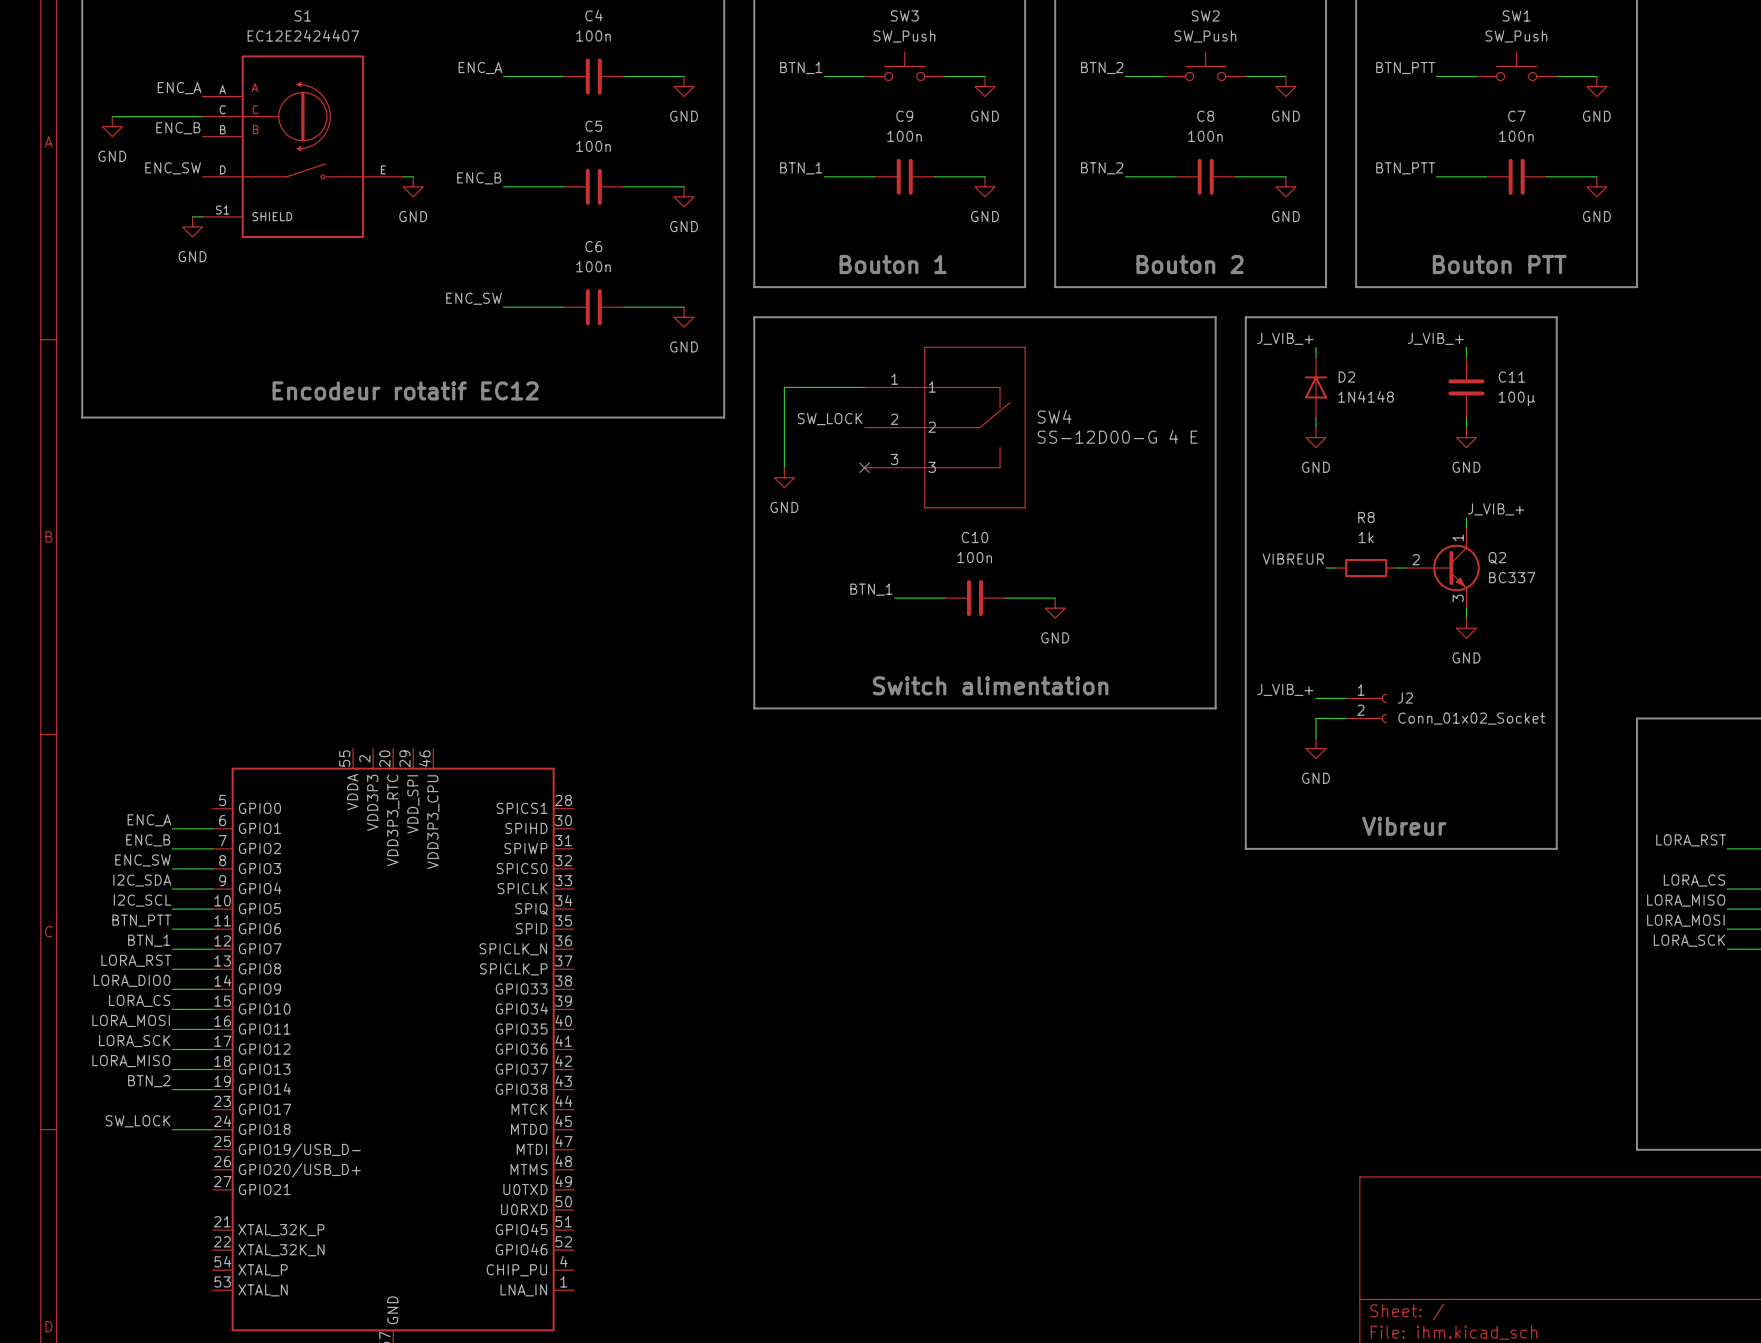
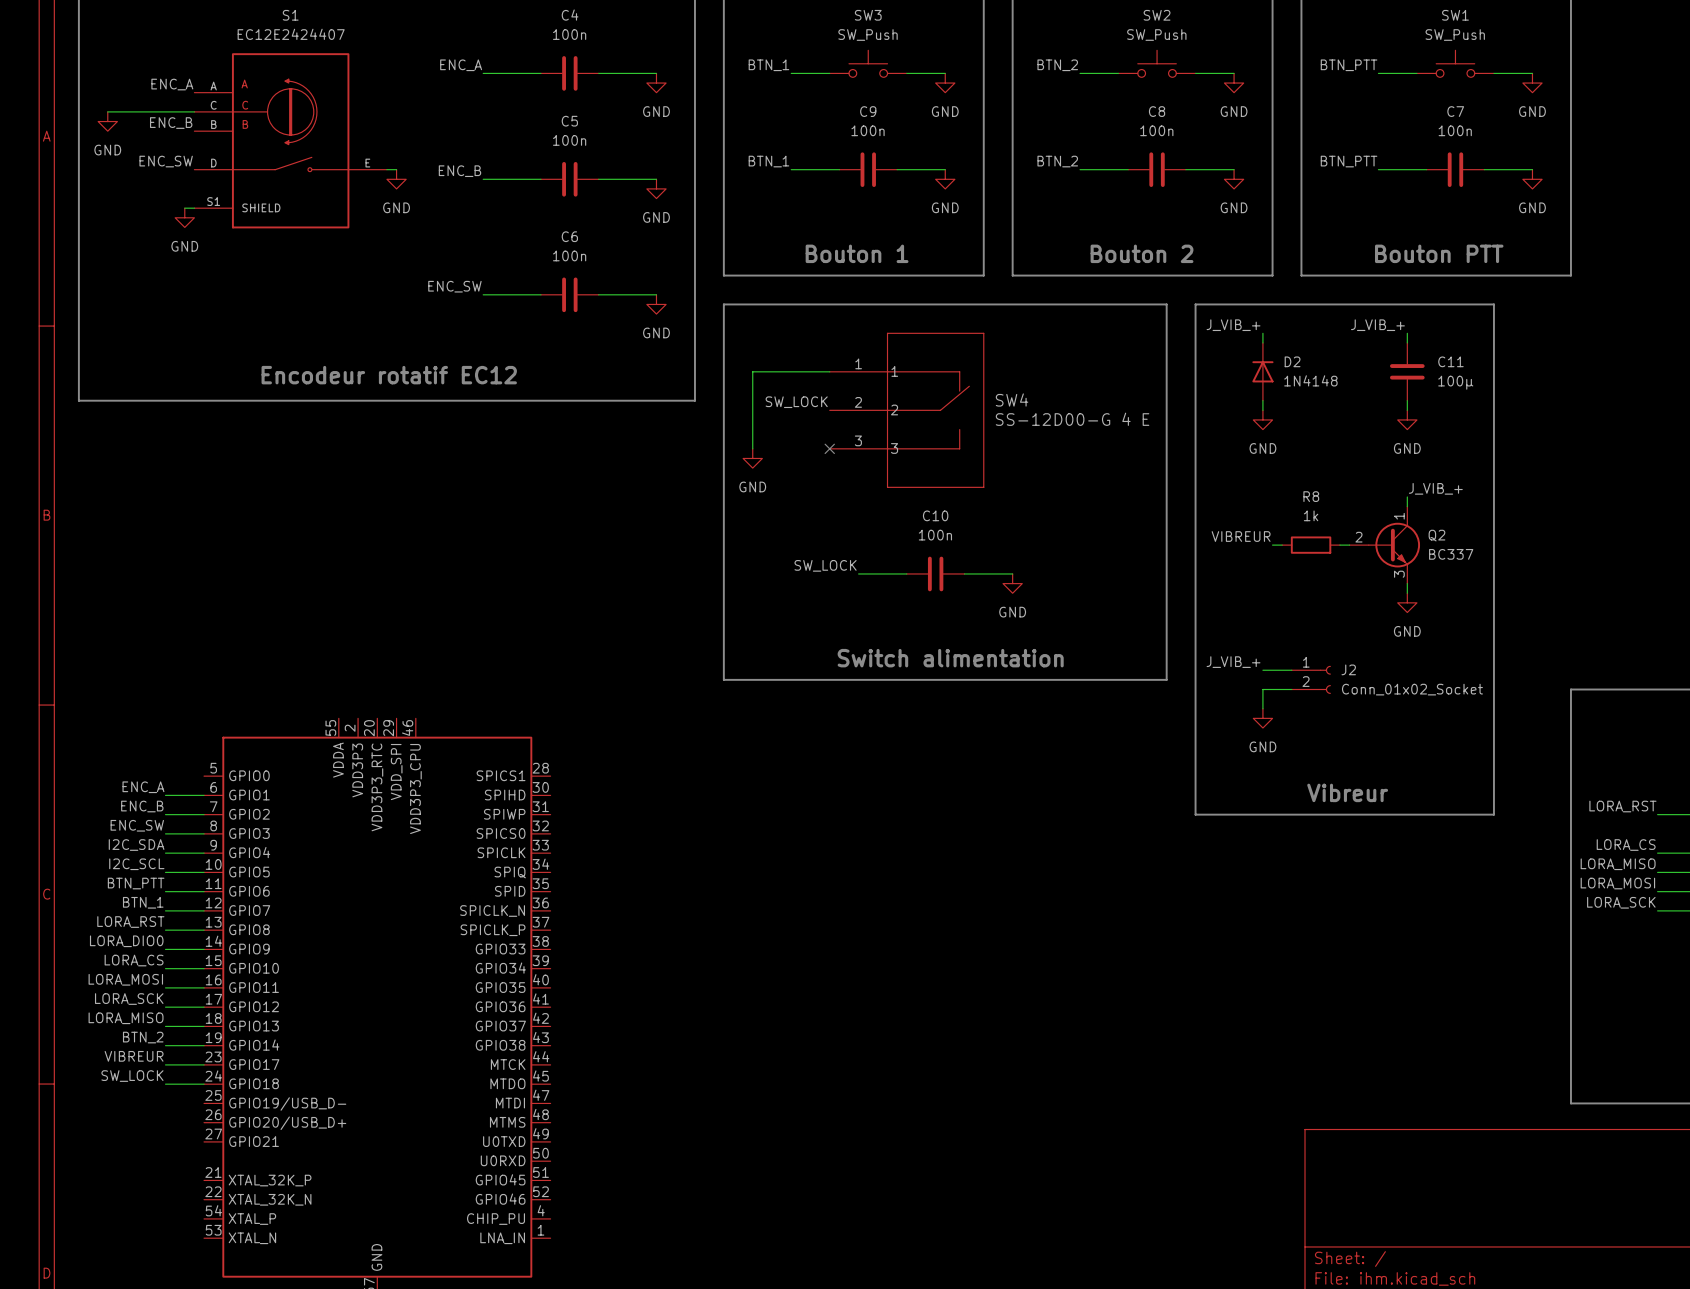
label: BTN_1 (871, 589) -> SW_LOCK (825, 565)
label: none -> VIBREUR (134, 1056)
wire: none -> (165, 1064) (204, 1064)

